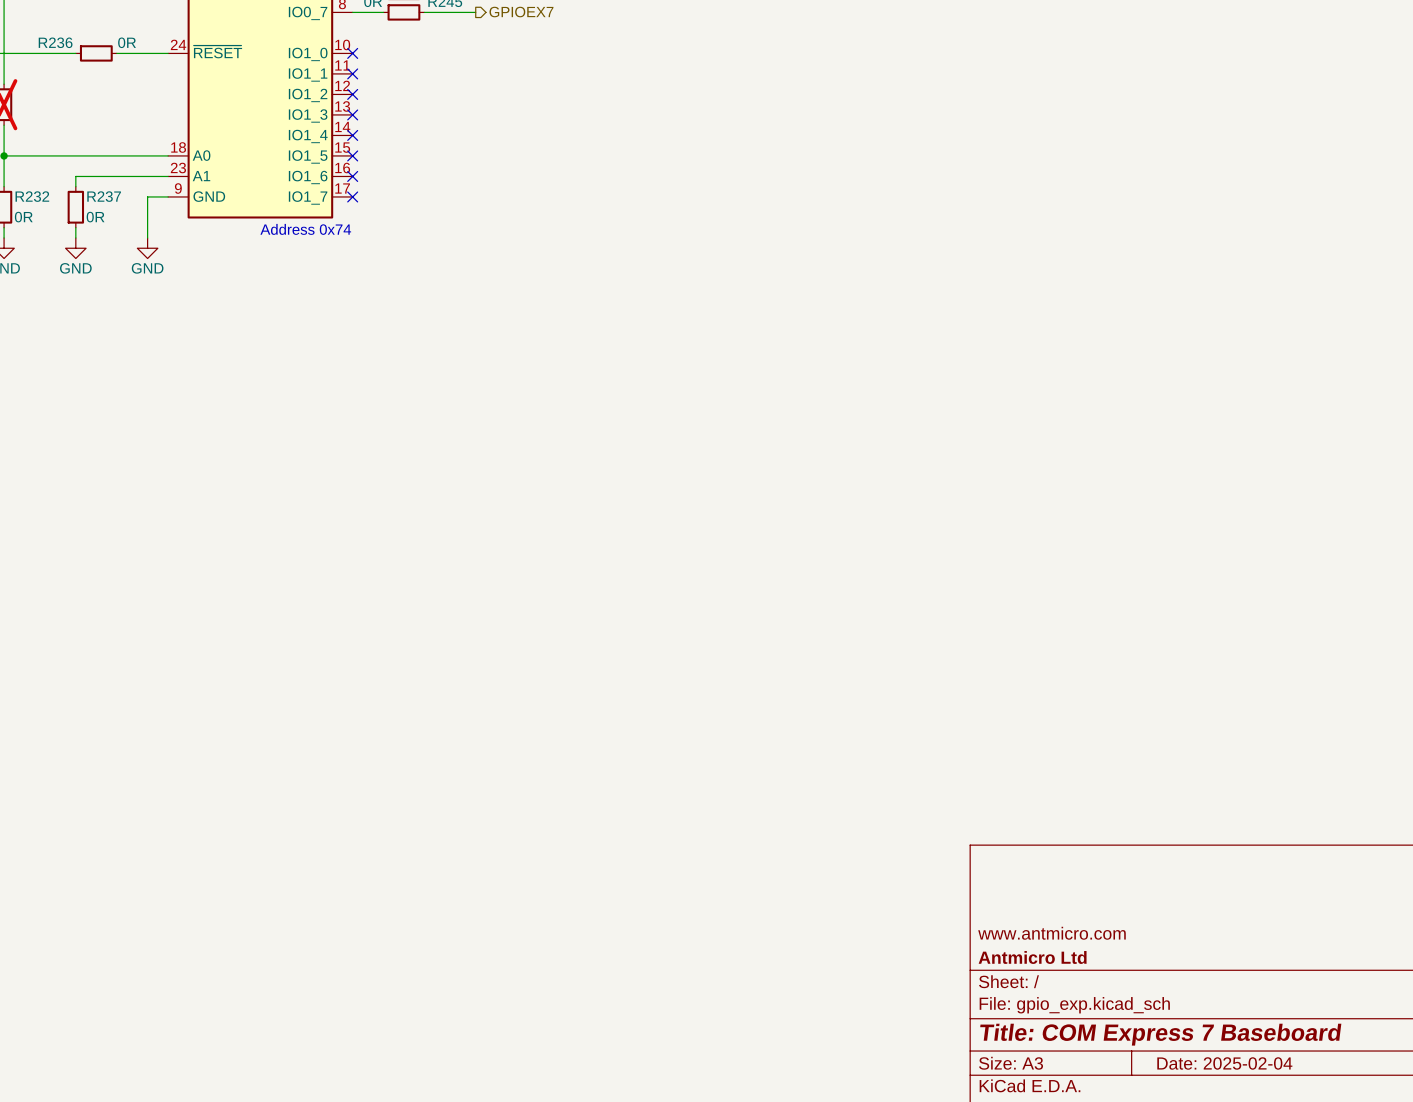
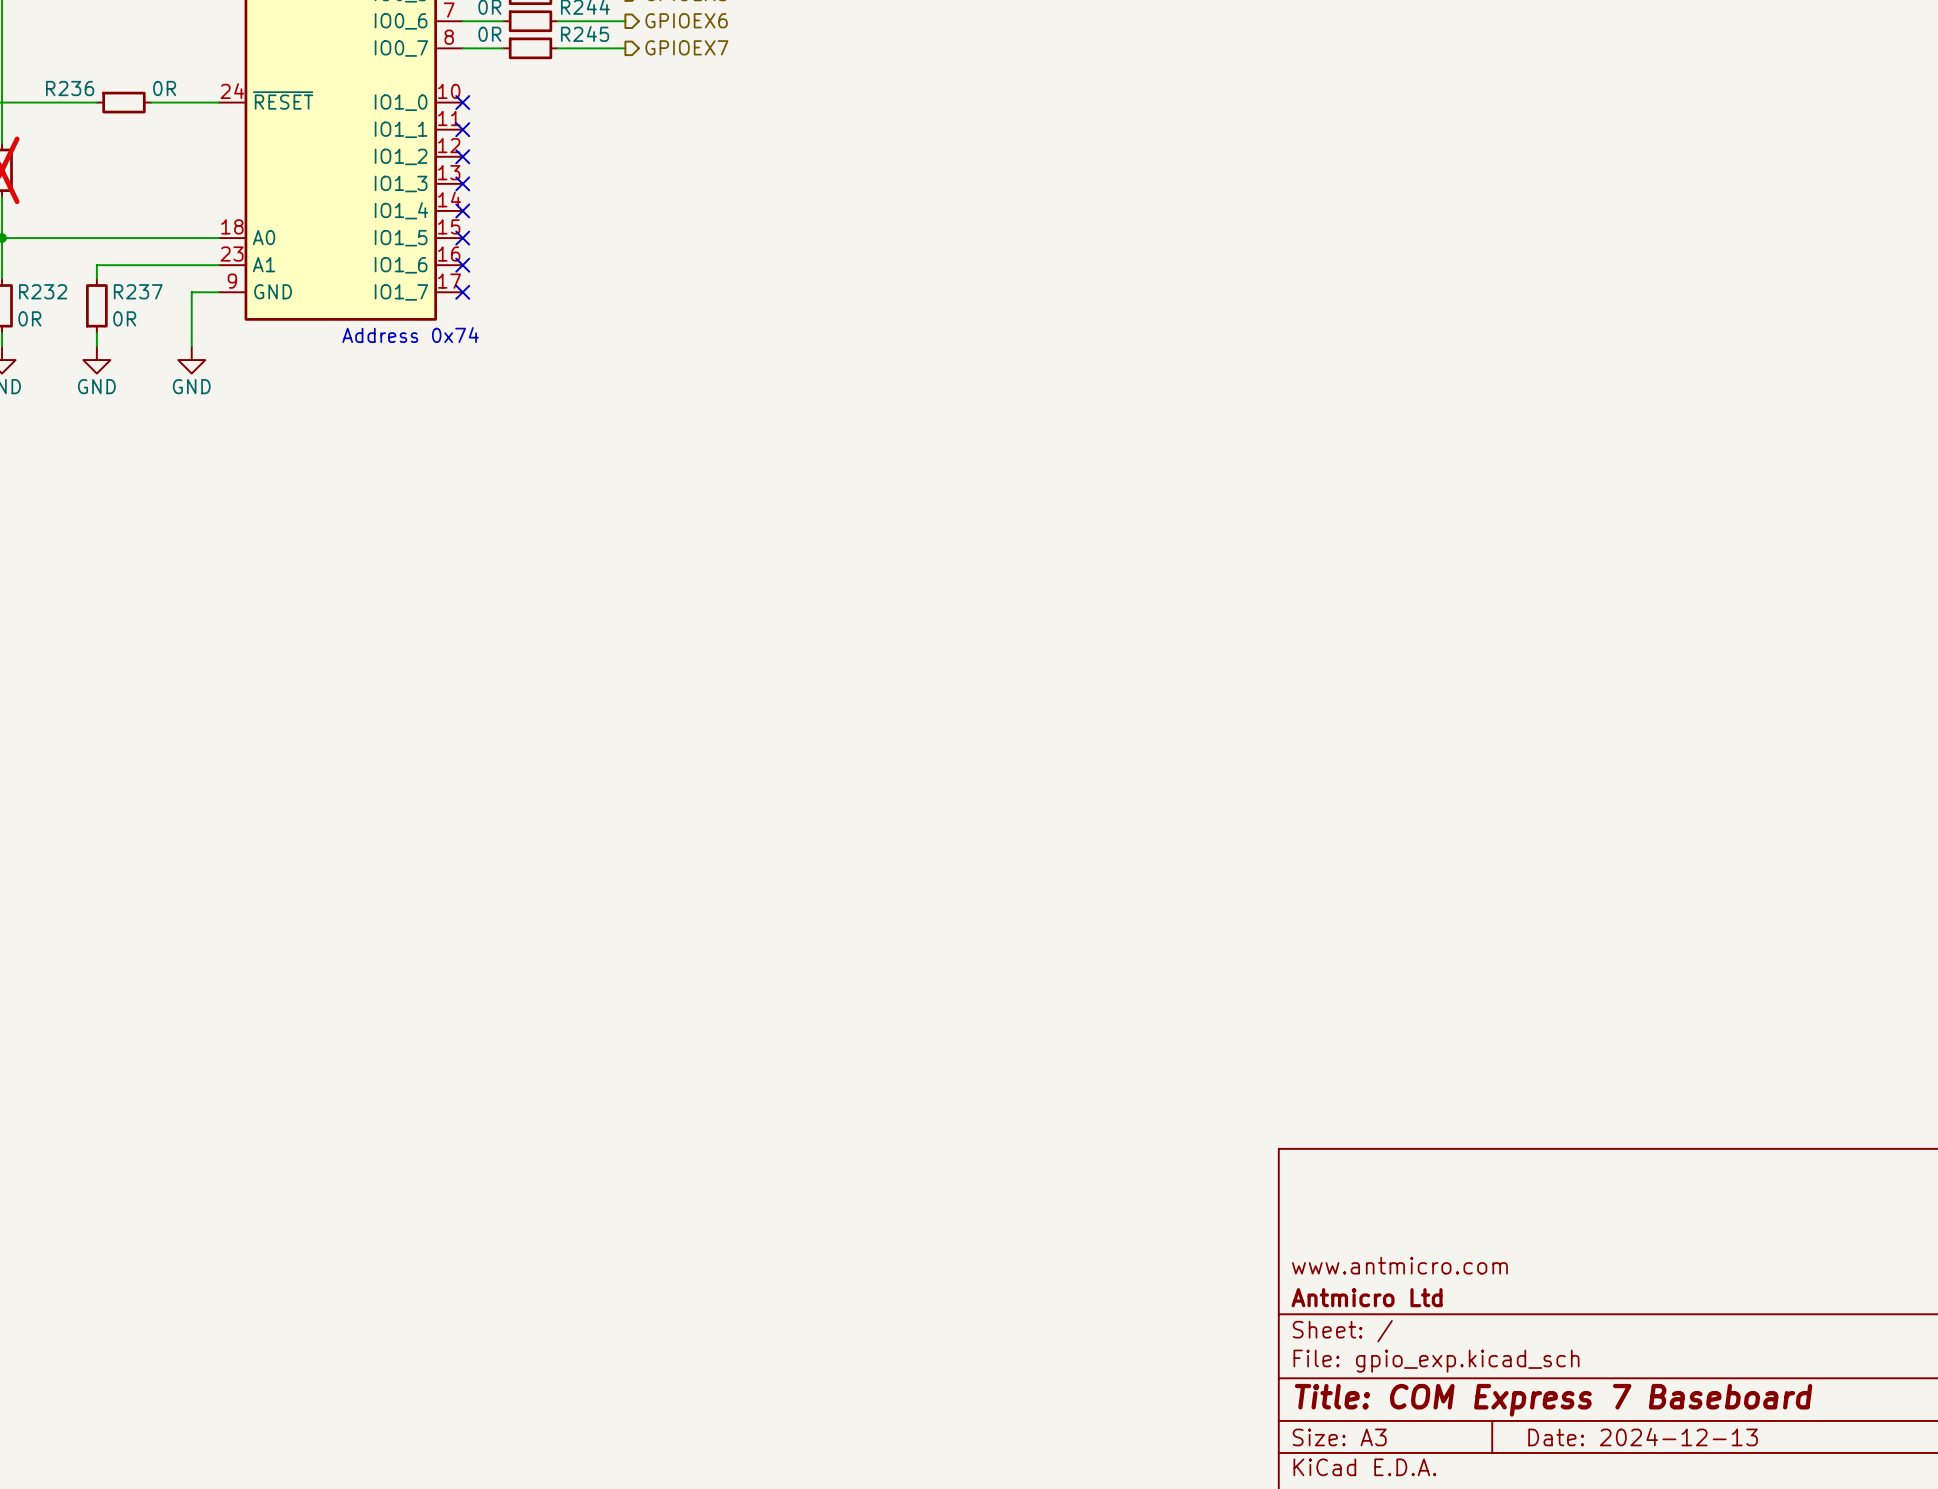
title block: Date: 2025-02-04 (1224, 1063) -> Date: 2024-12-13 (1643, 1437)

